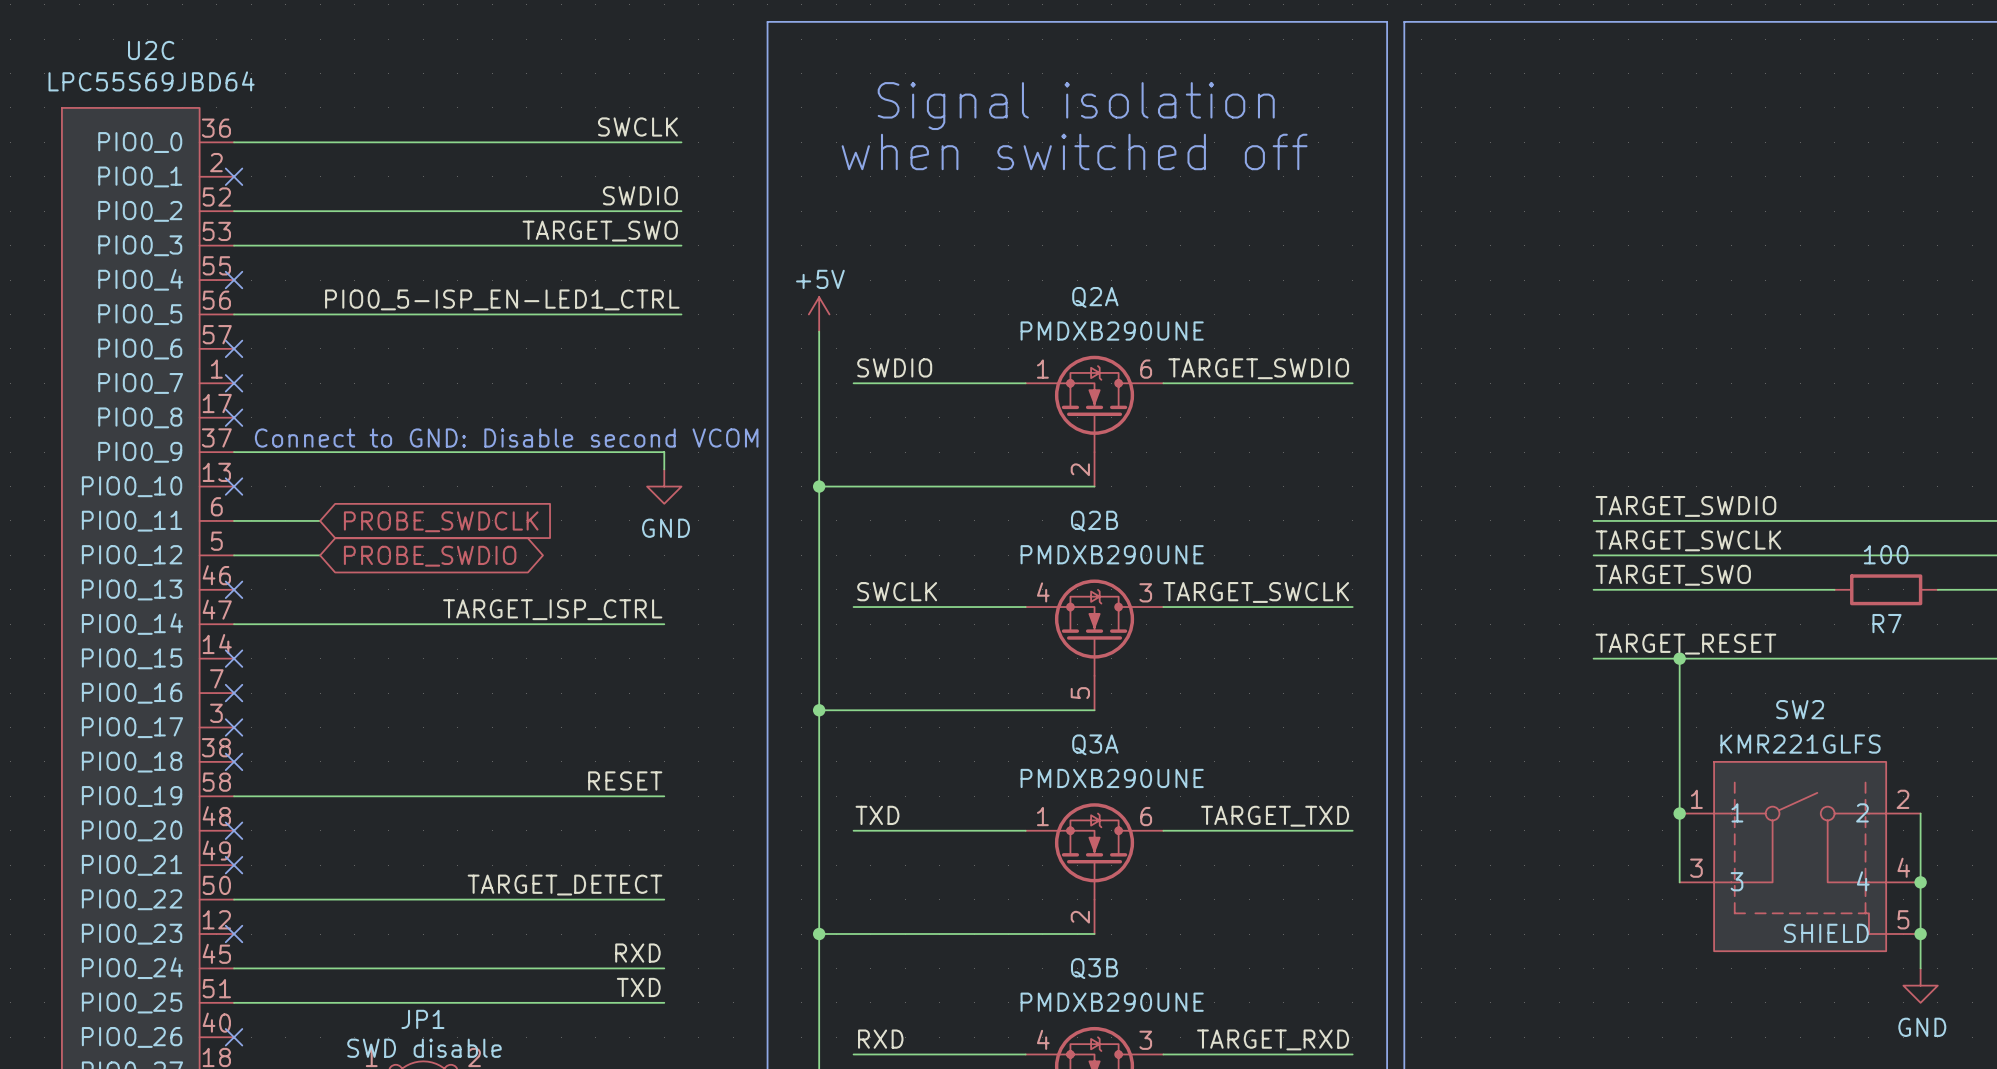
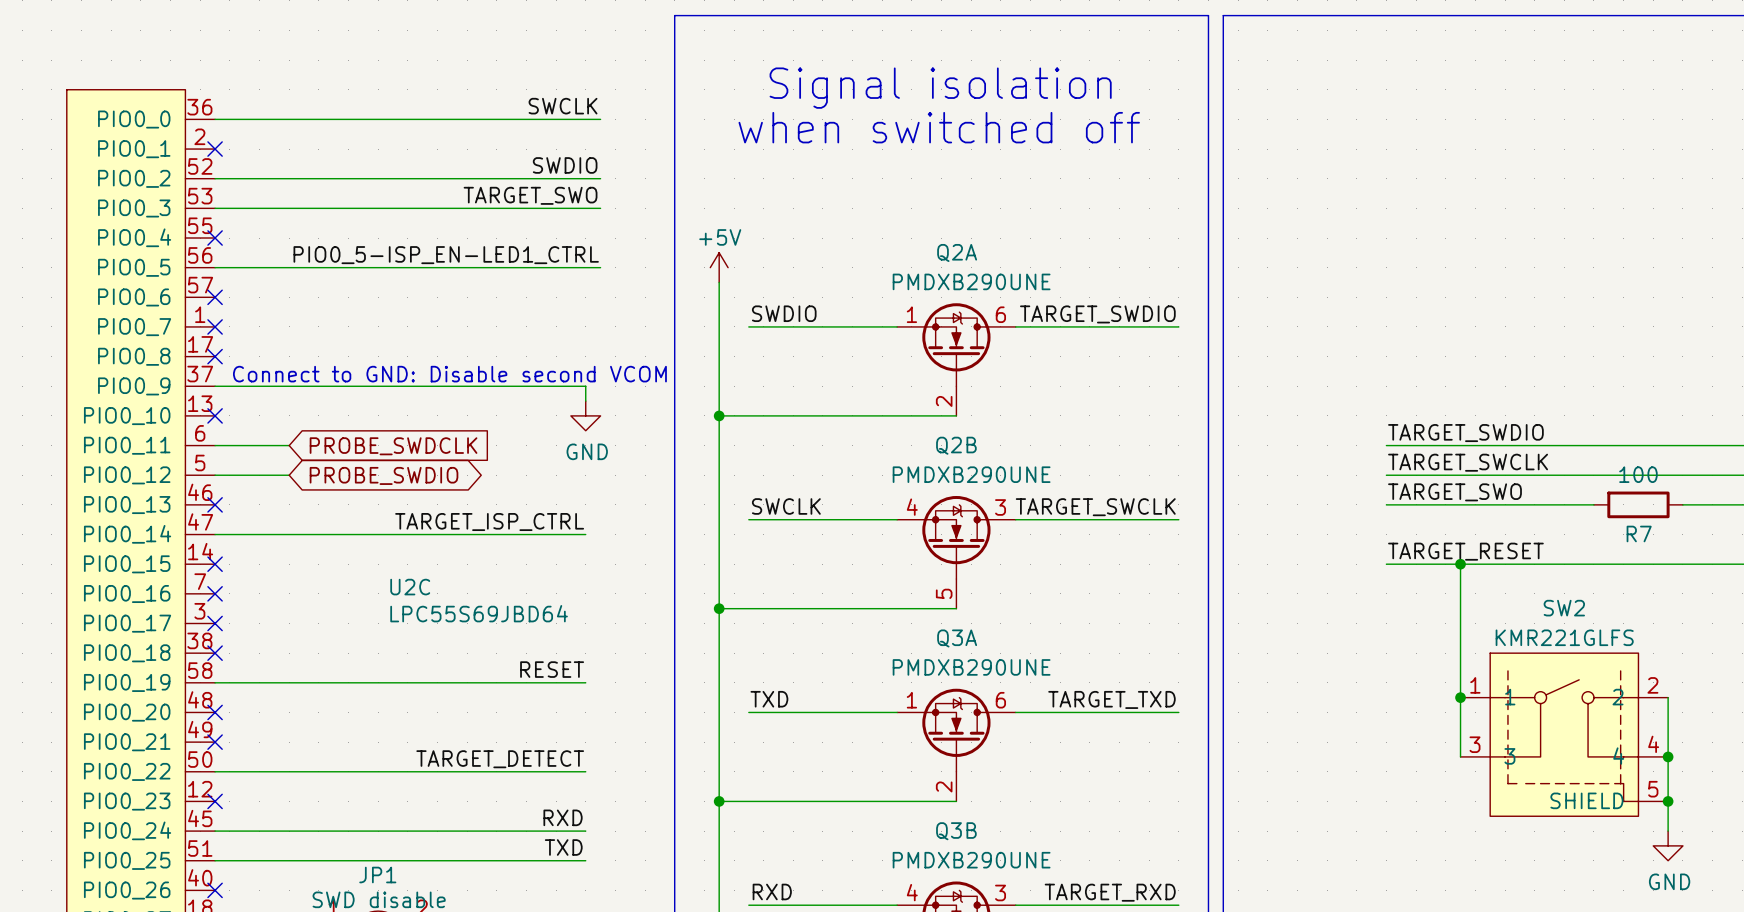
U2C name position: U2C (151, 50) -> U2C (410, 587)
U2C value position: LPC55S69JBD64 (151, 81) -> LPC55S69JBD64 (479, 613)

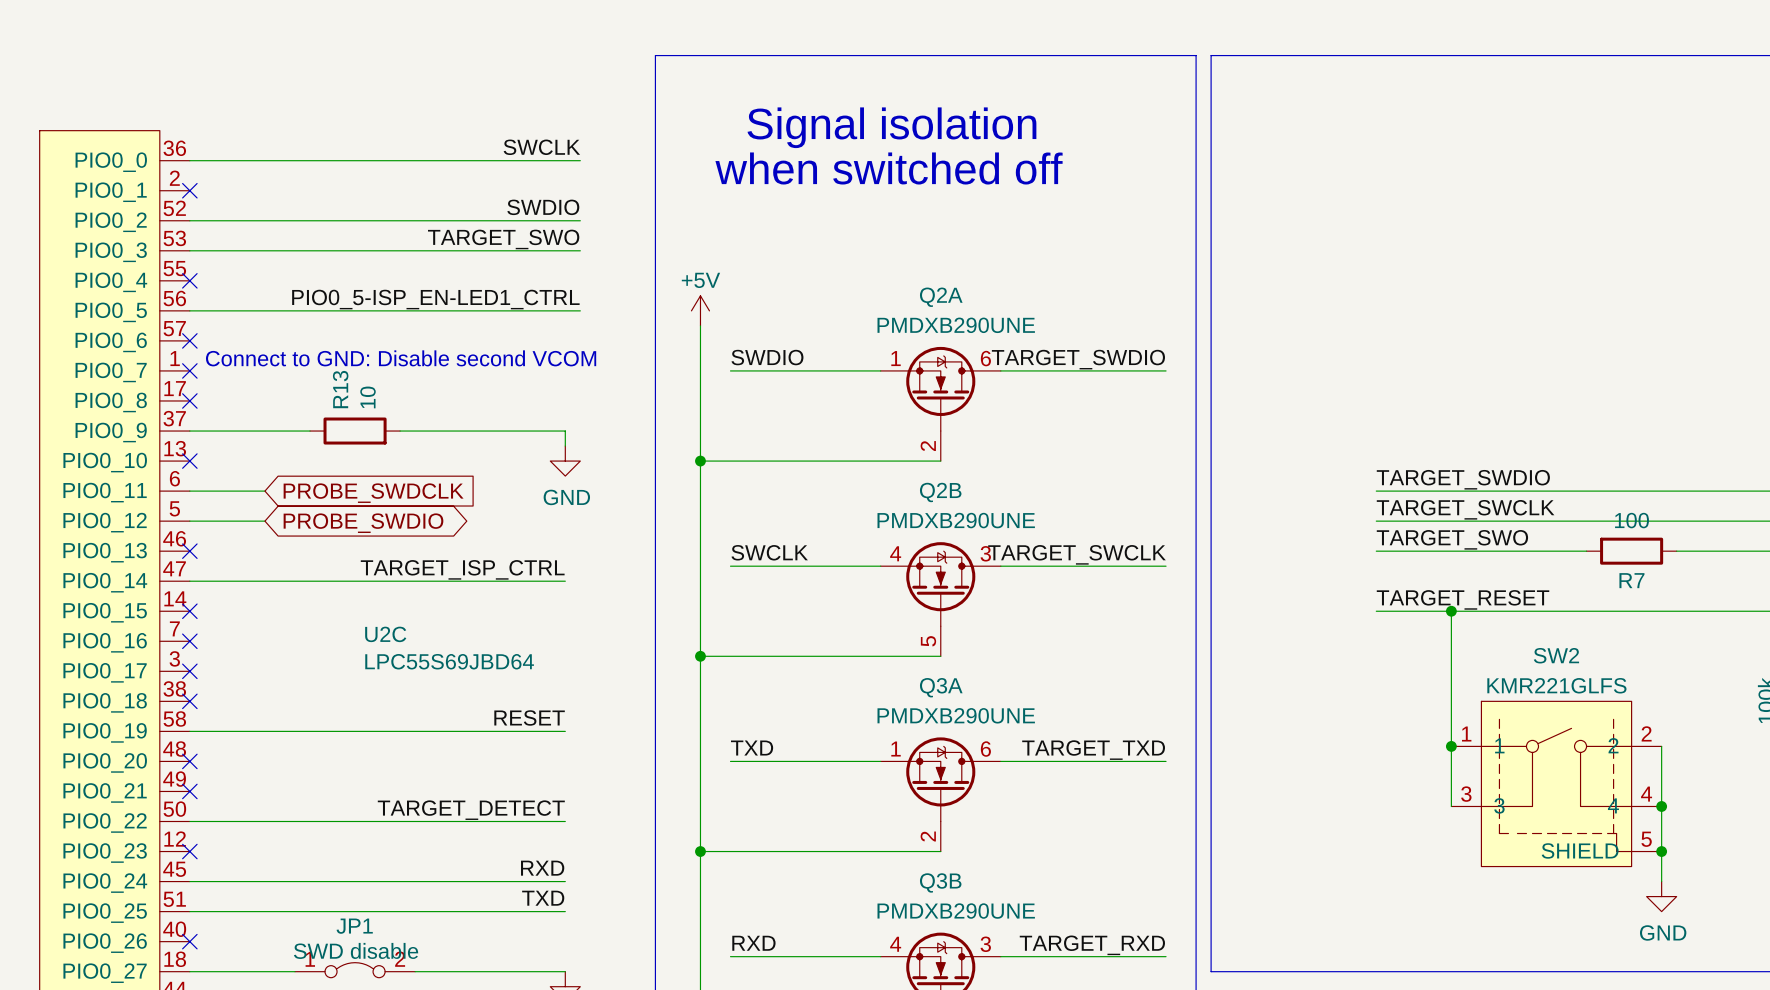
text position: Connect to GND: Disable second VCOM (449, 374) -> Connect to GND: Disable second VCOM (401, 358)
wire: (333, 386) (422, 386) -> none
R13: none -> 10 (355, 431)

